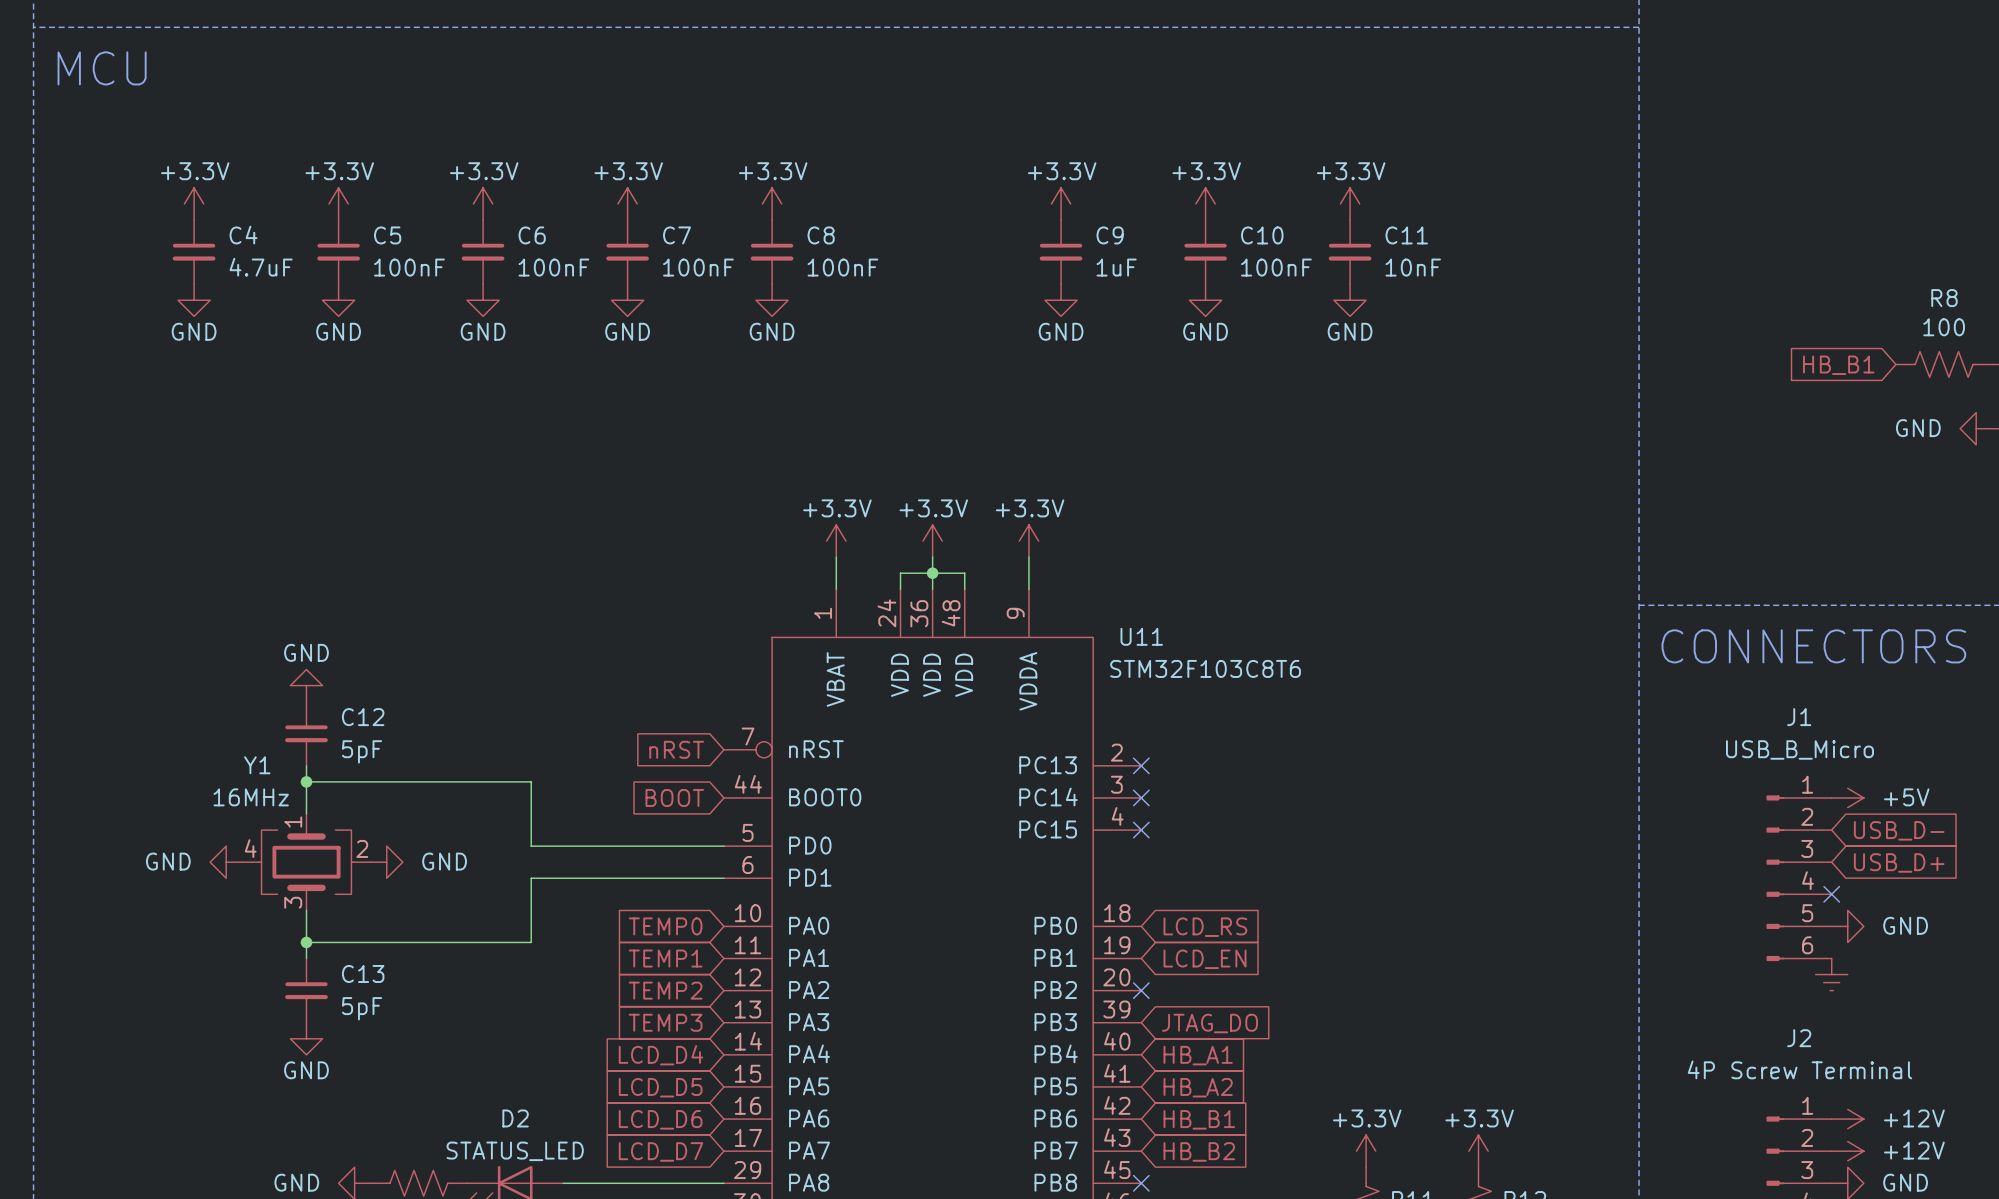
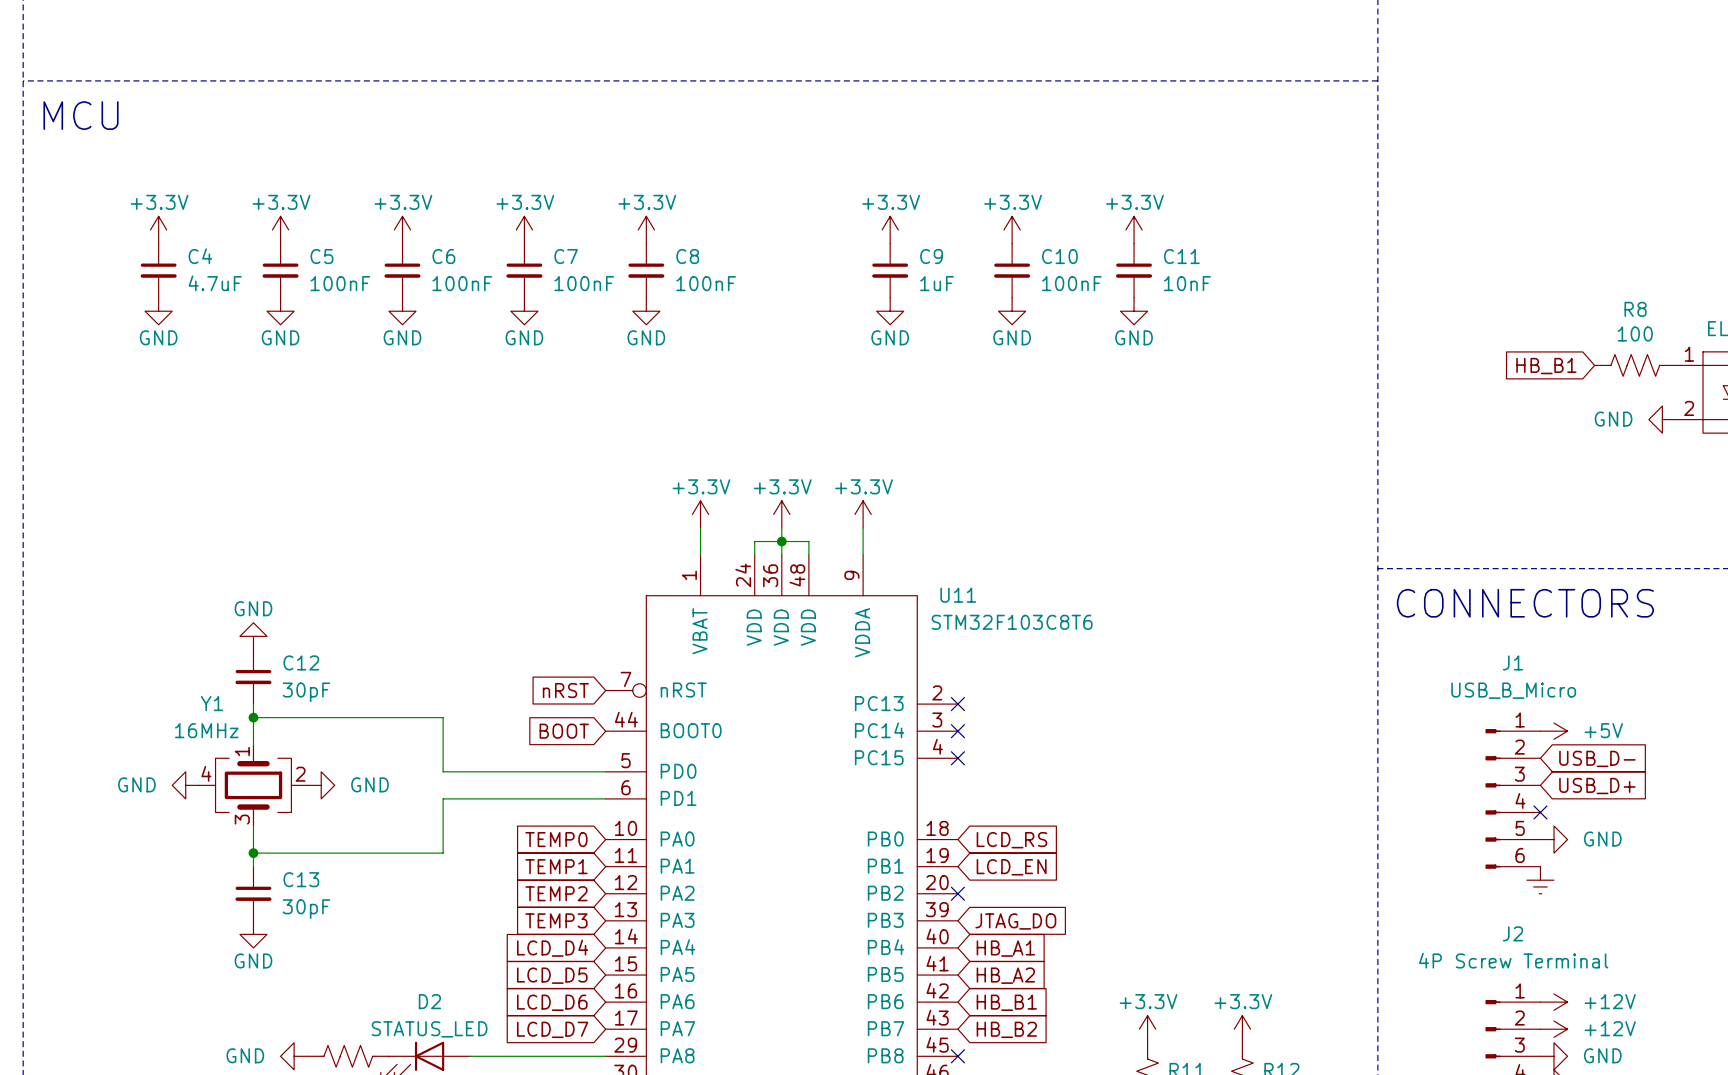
C12 value: 5pF (362, 751) -> 30pF (306, 692)
C13 value: 5pF (362, 1008) -> 30pF (306, 909)

